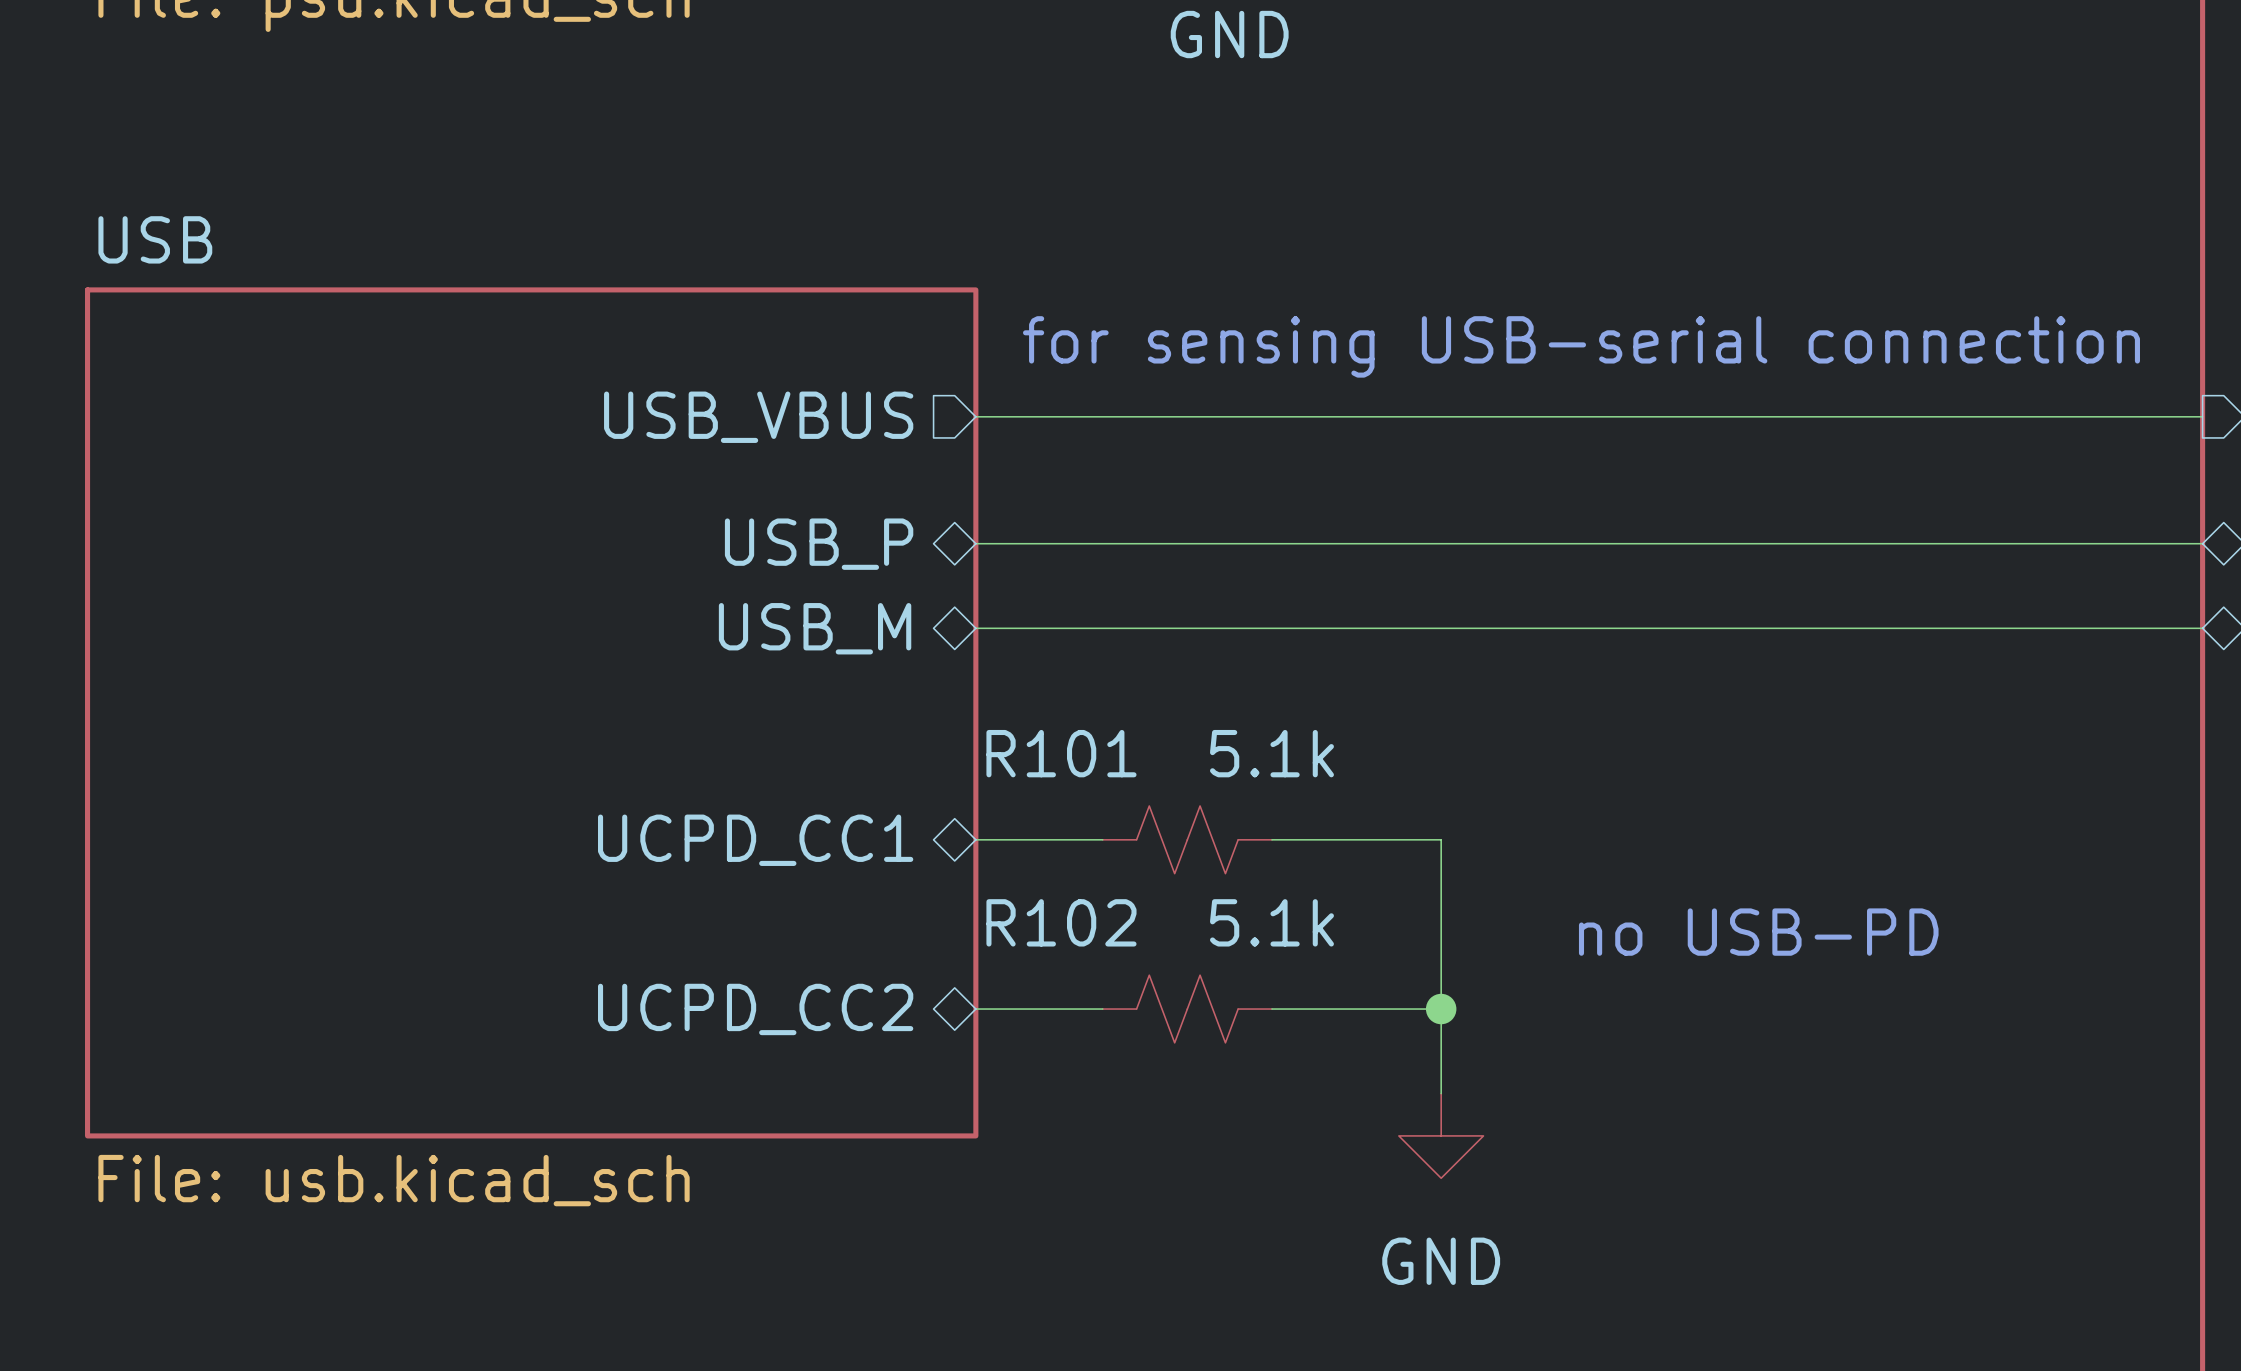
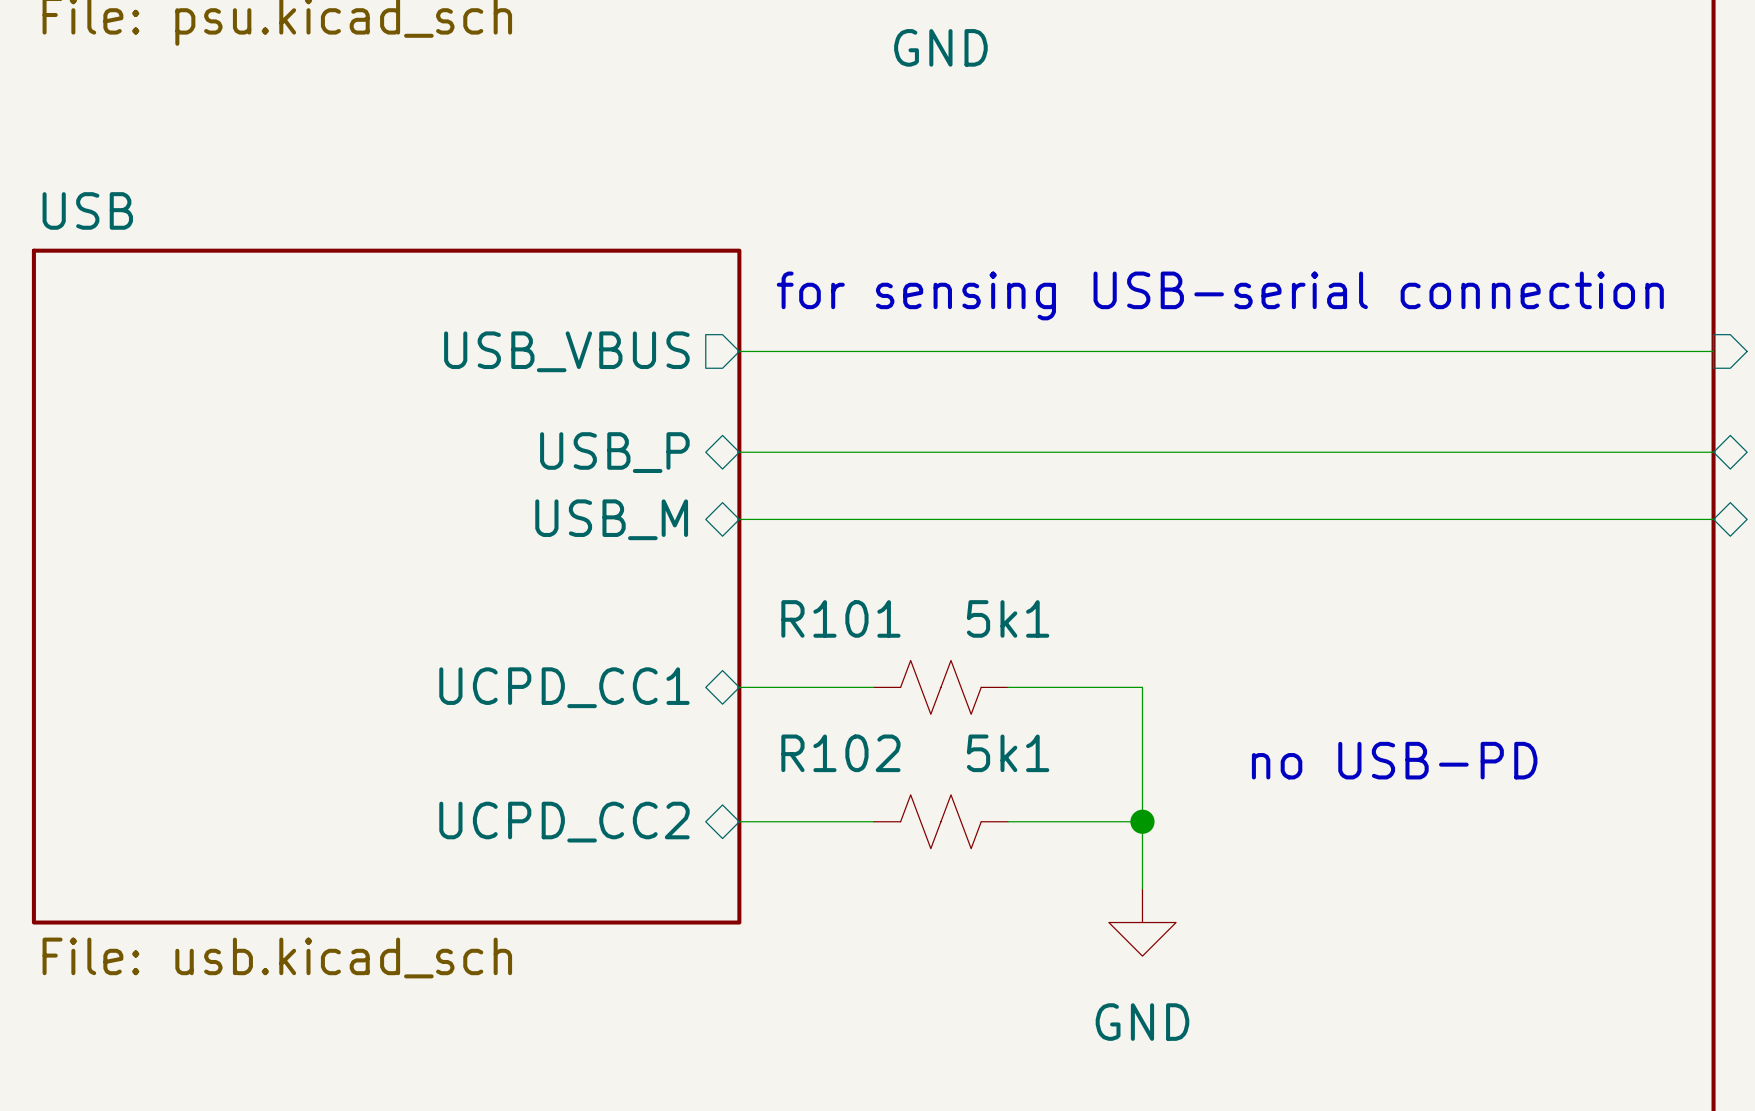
R101 value: 5.1k (1271, 753) -> 5k1 (1008, 618)
R101 position: (1187, 839) -> (940, 687)
wire: (1441, 839) (1441, 1093) -> (1108, 687) (1142, 687) (1142, 888)
R102 value: 5.1k (1271, 922) -> 5k1 (1008, 753)
text position: no USB-PD (1758, 932) -> no USB-PD (1394, 760)
R102 position: (1187, 1009) -> (940, 821)
wire: none -> (1108, 821) (1142, 821)
junction position: (1441, 1009) -> (1142, 821)
power symbol position: GND (1441, 1135) -> GND (1142, 922)

